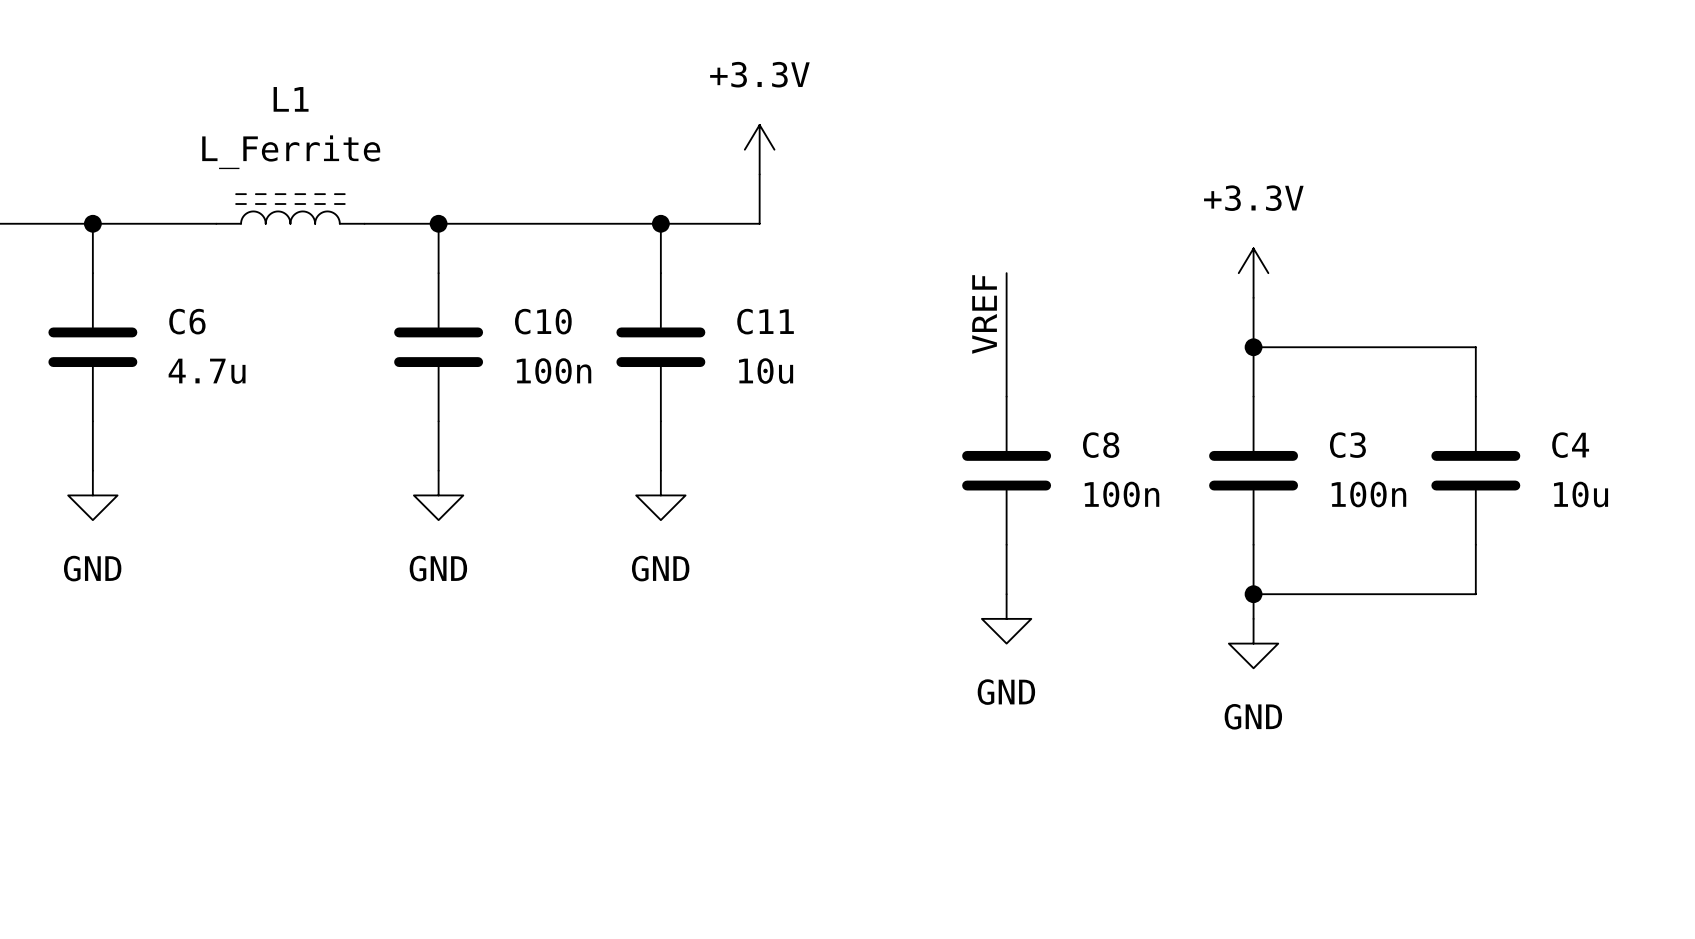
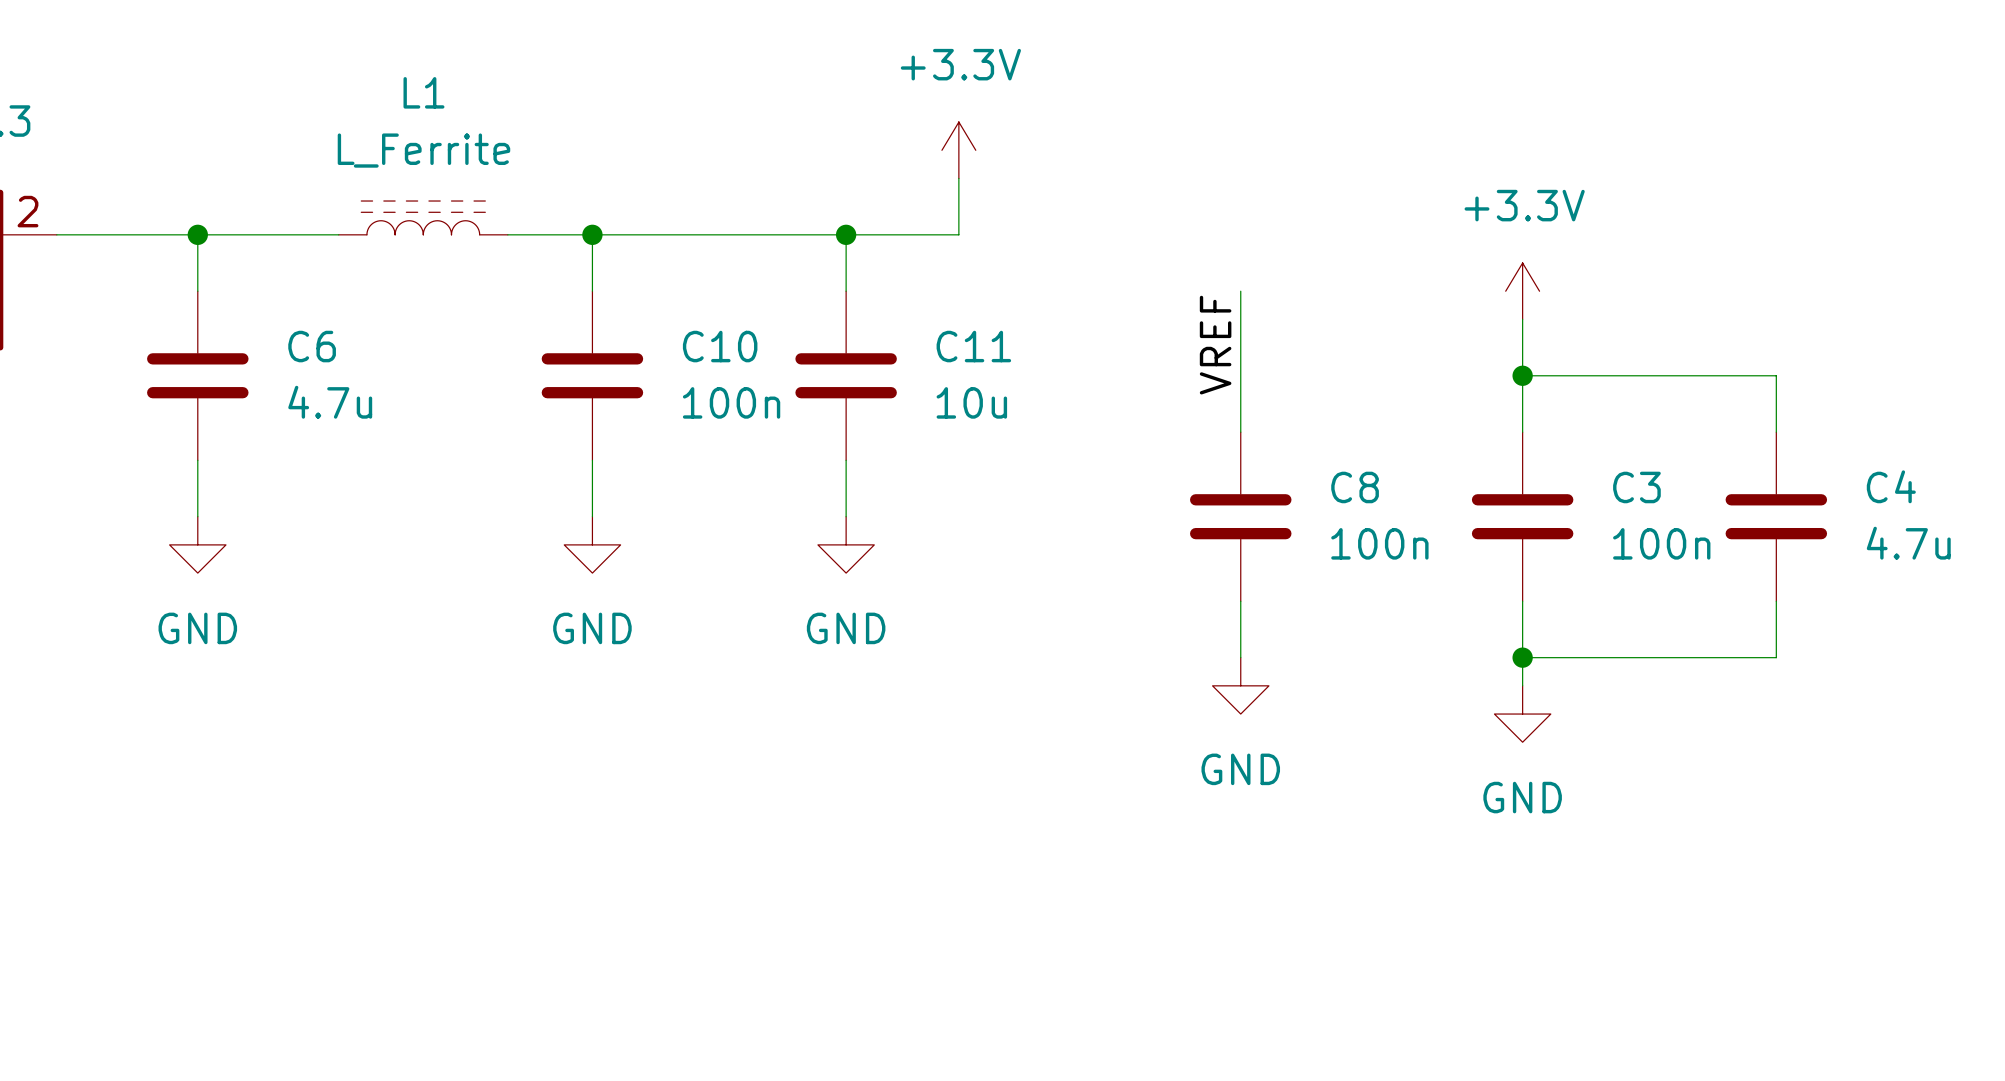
C4 value: 10u (1581, 494) -> 4.7u (1908, 543)

